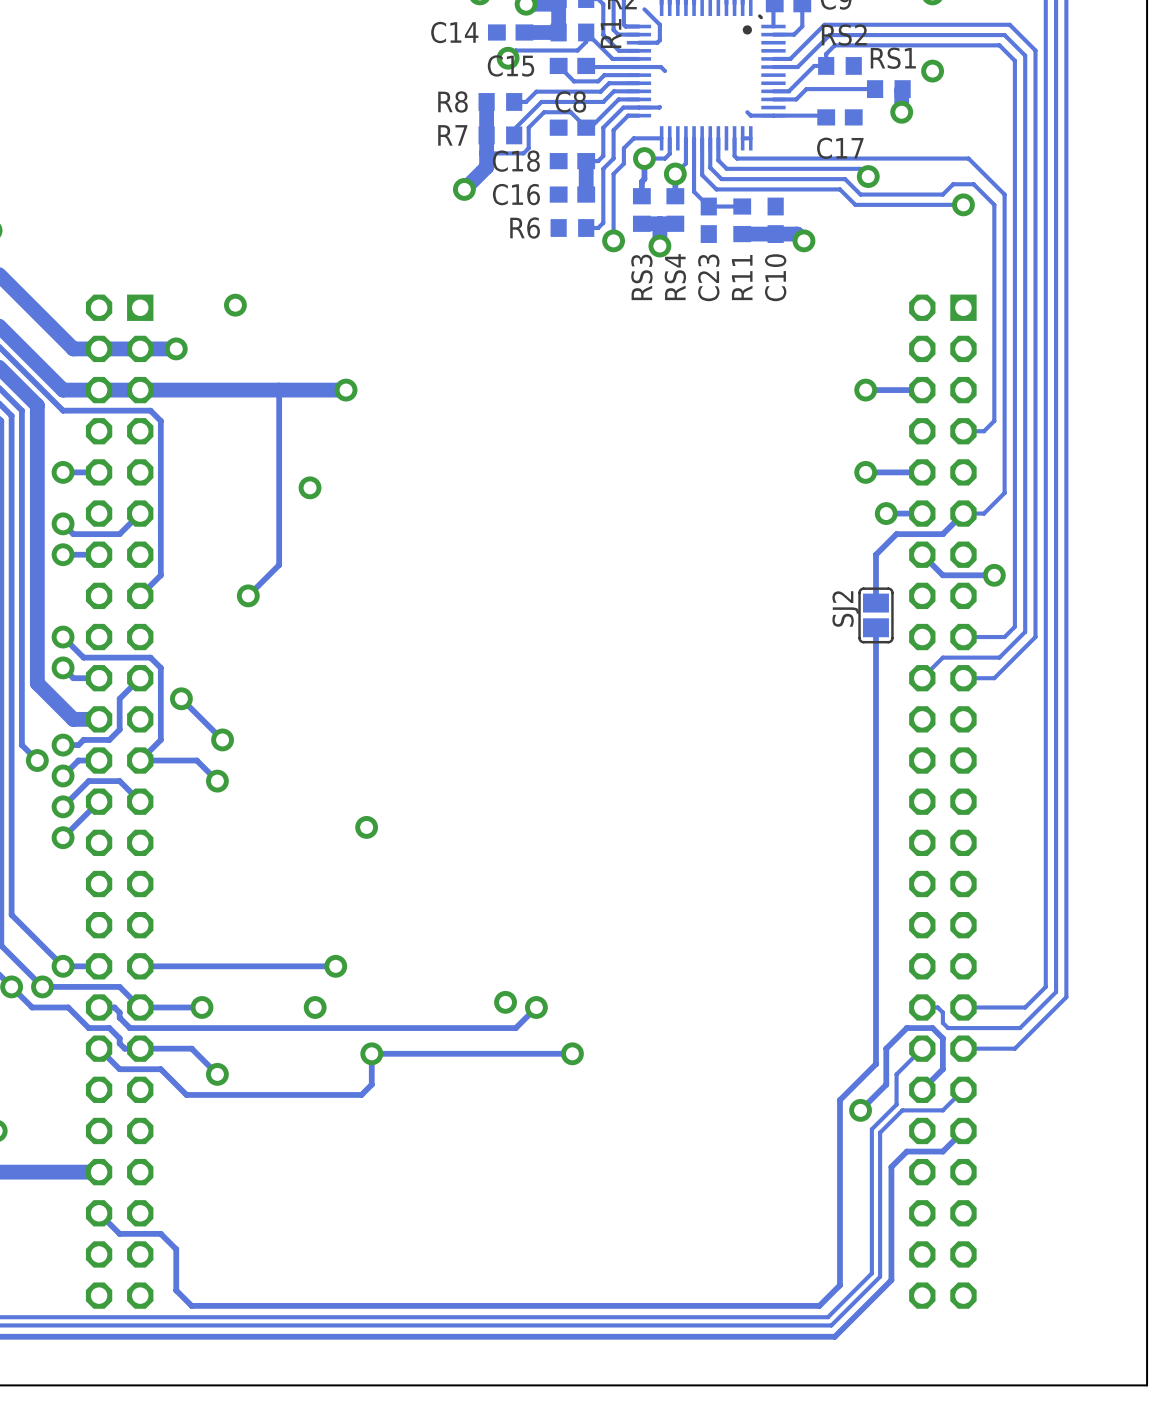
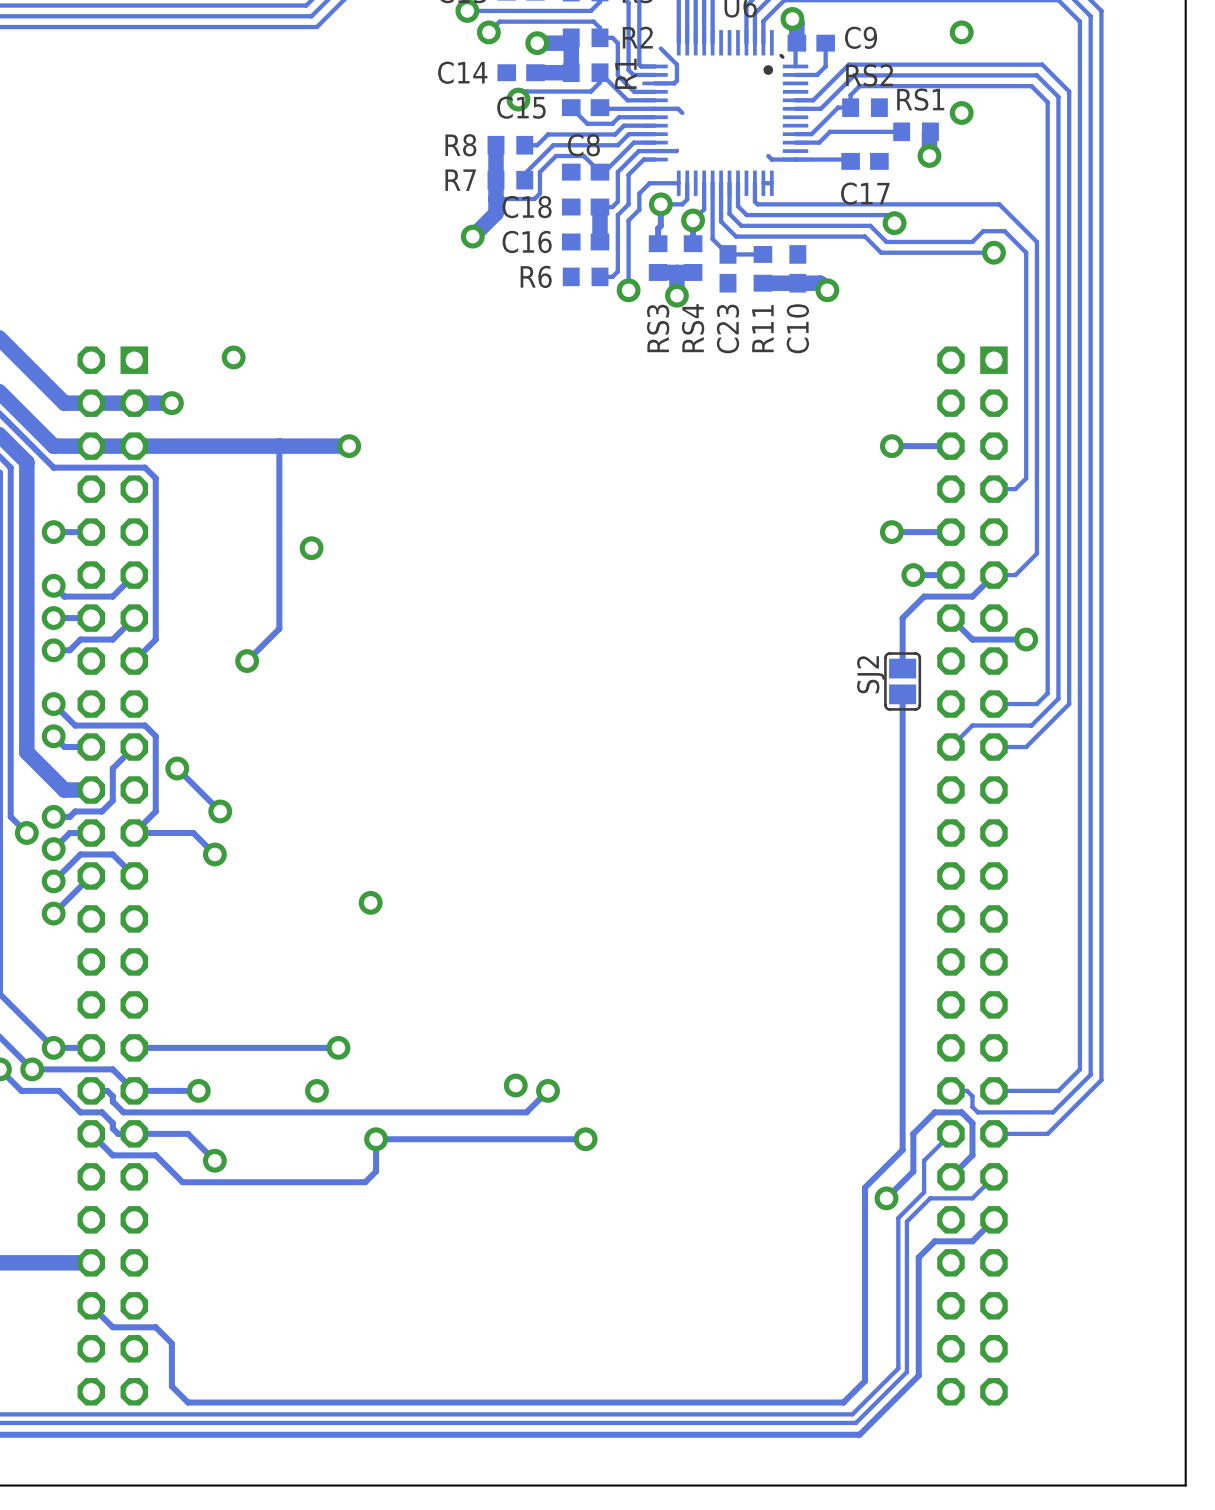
track: none -> (134, 618) (112, 639) (80, 639) (69, 650) (53, 650)
via: none -> (53, 650)

